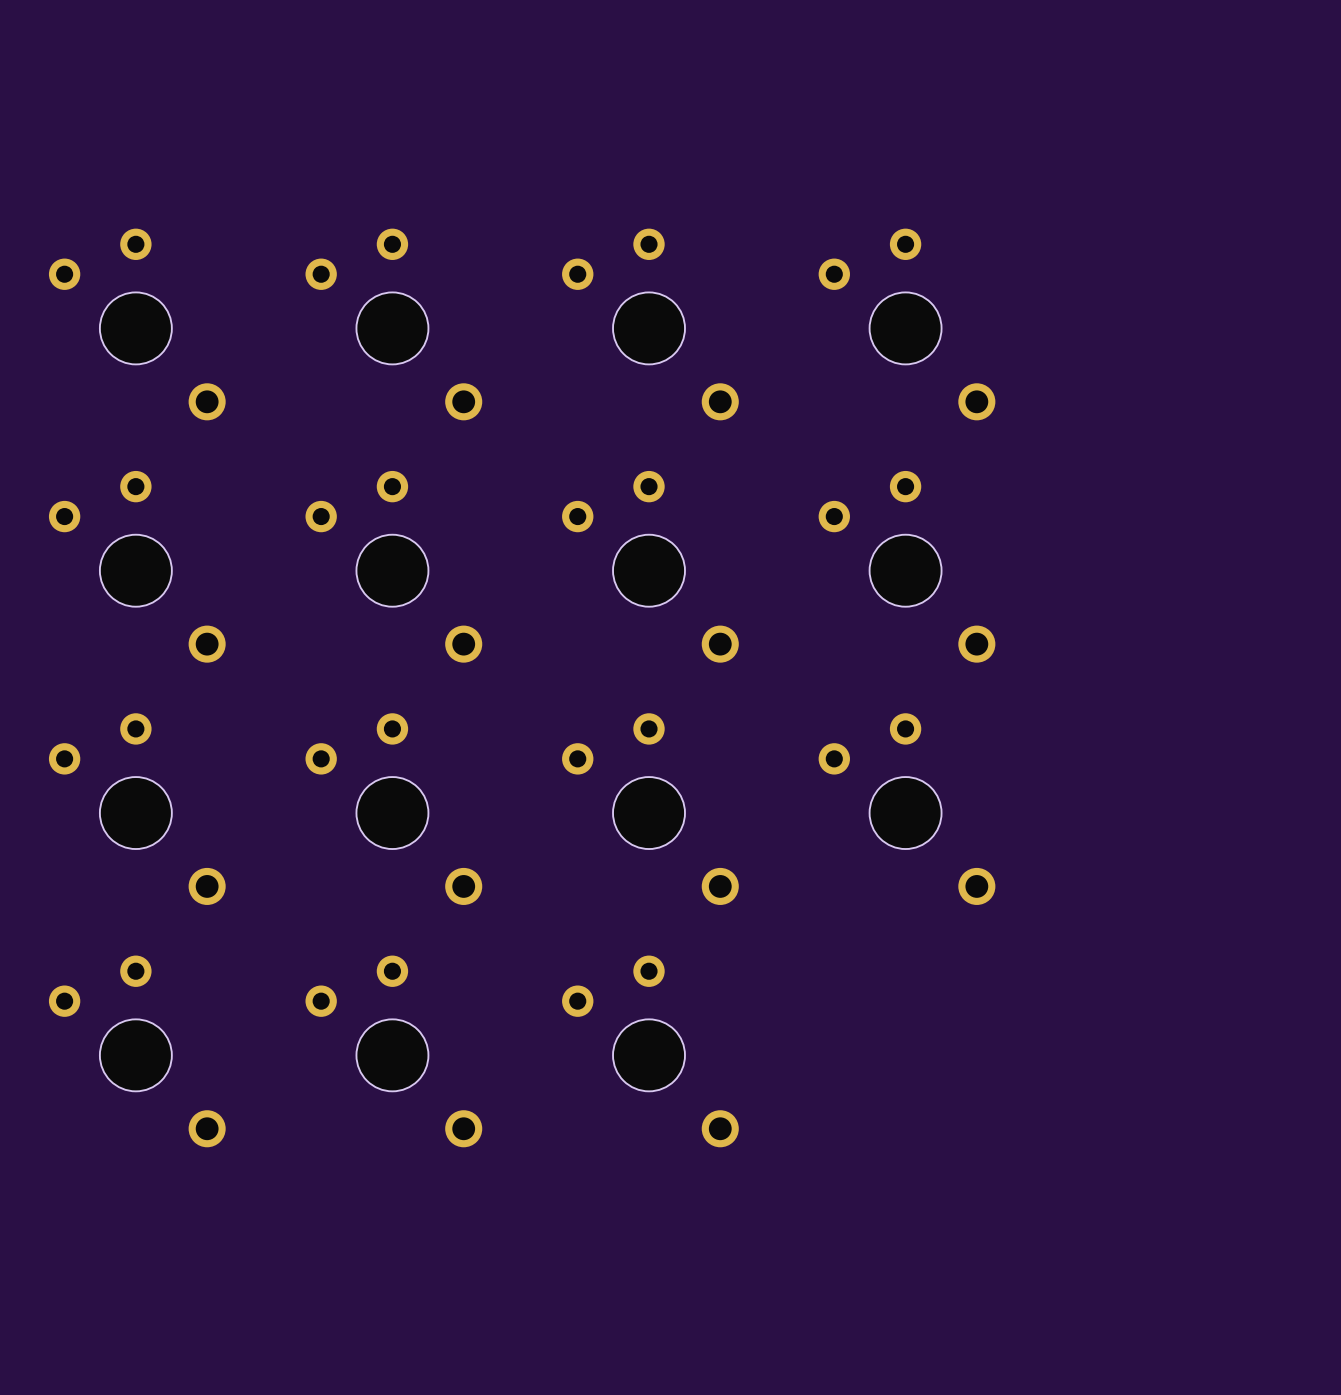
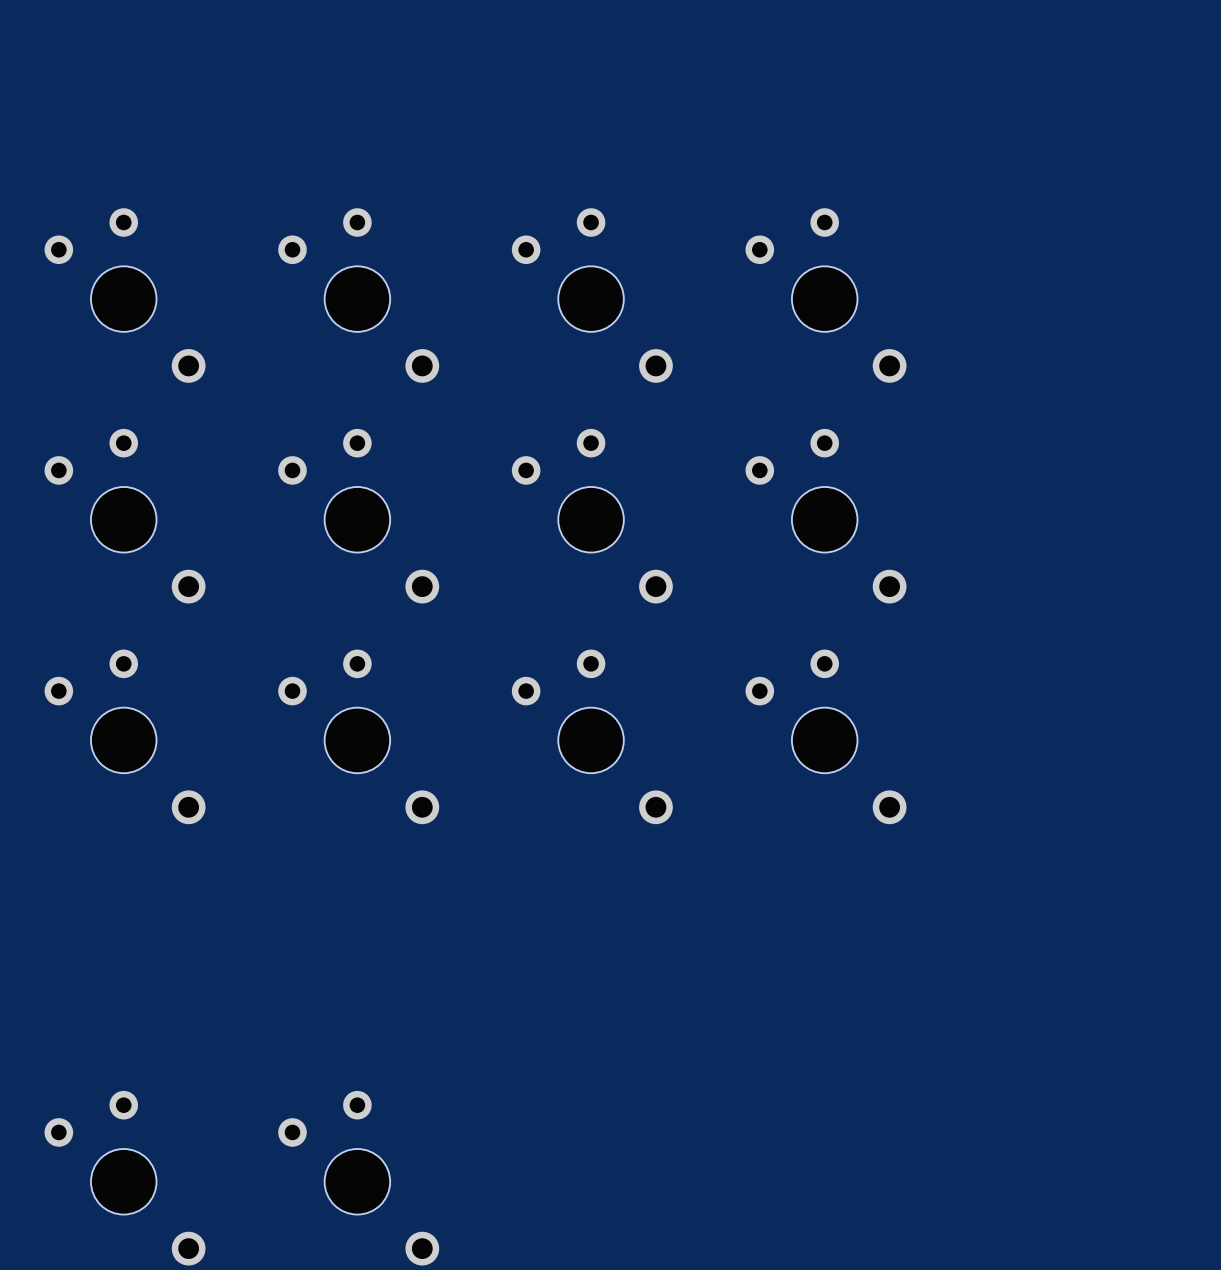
part: (137, 1051) -> none
part: (393, 1051) -> none
part: (650, 1051) -> none
part: none -> (125, 1178)
part: none -> (358, 1178)

